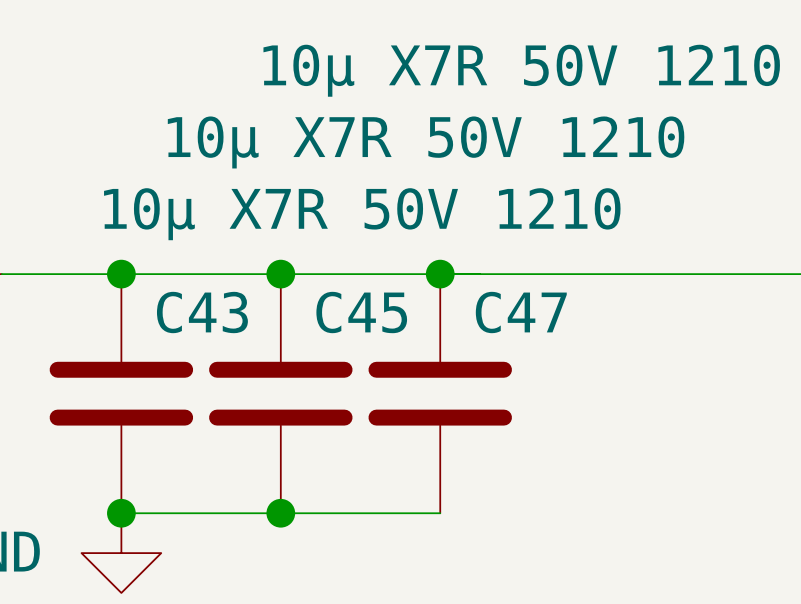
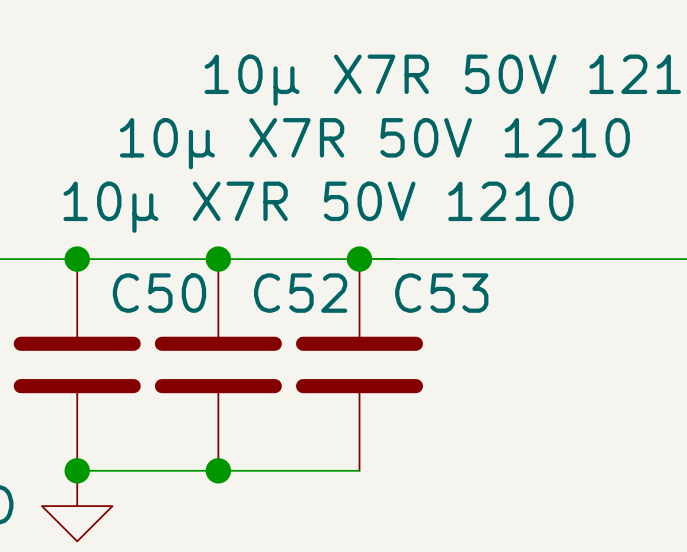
C43 name: C43 (202, 312) -> C50 (159, 293)
C45 name: C45 (361, 312) -> C52 (300, 293)
C47 name: C47 (521, 312) -> C53 (441, 293)

